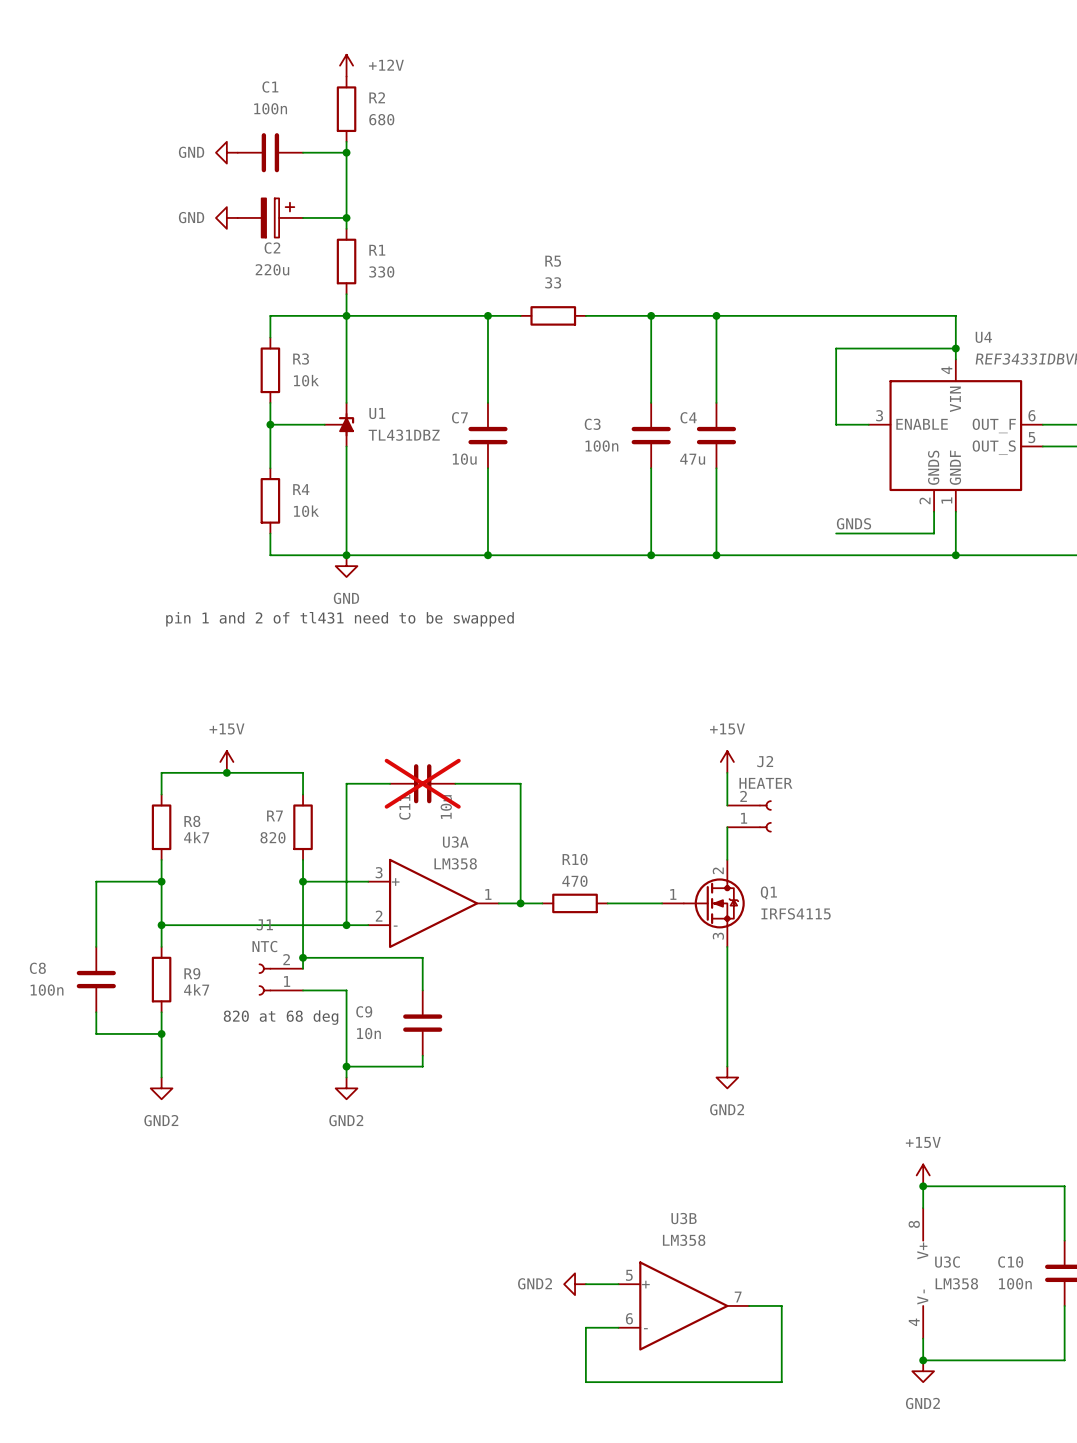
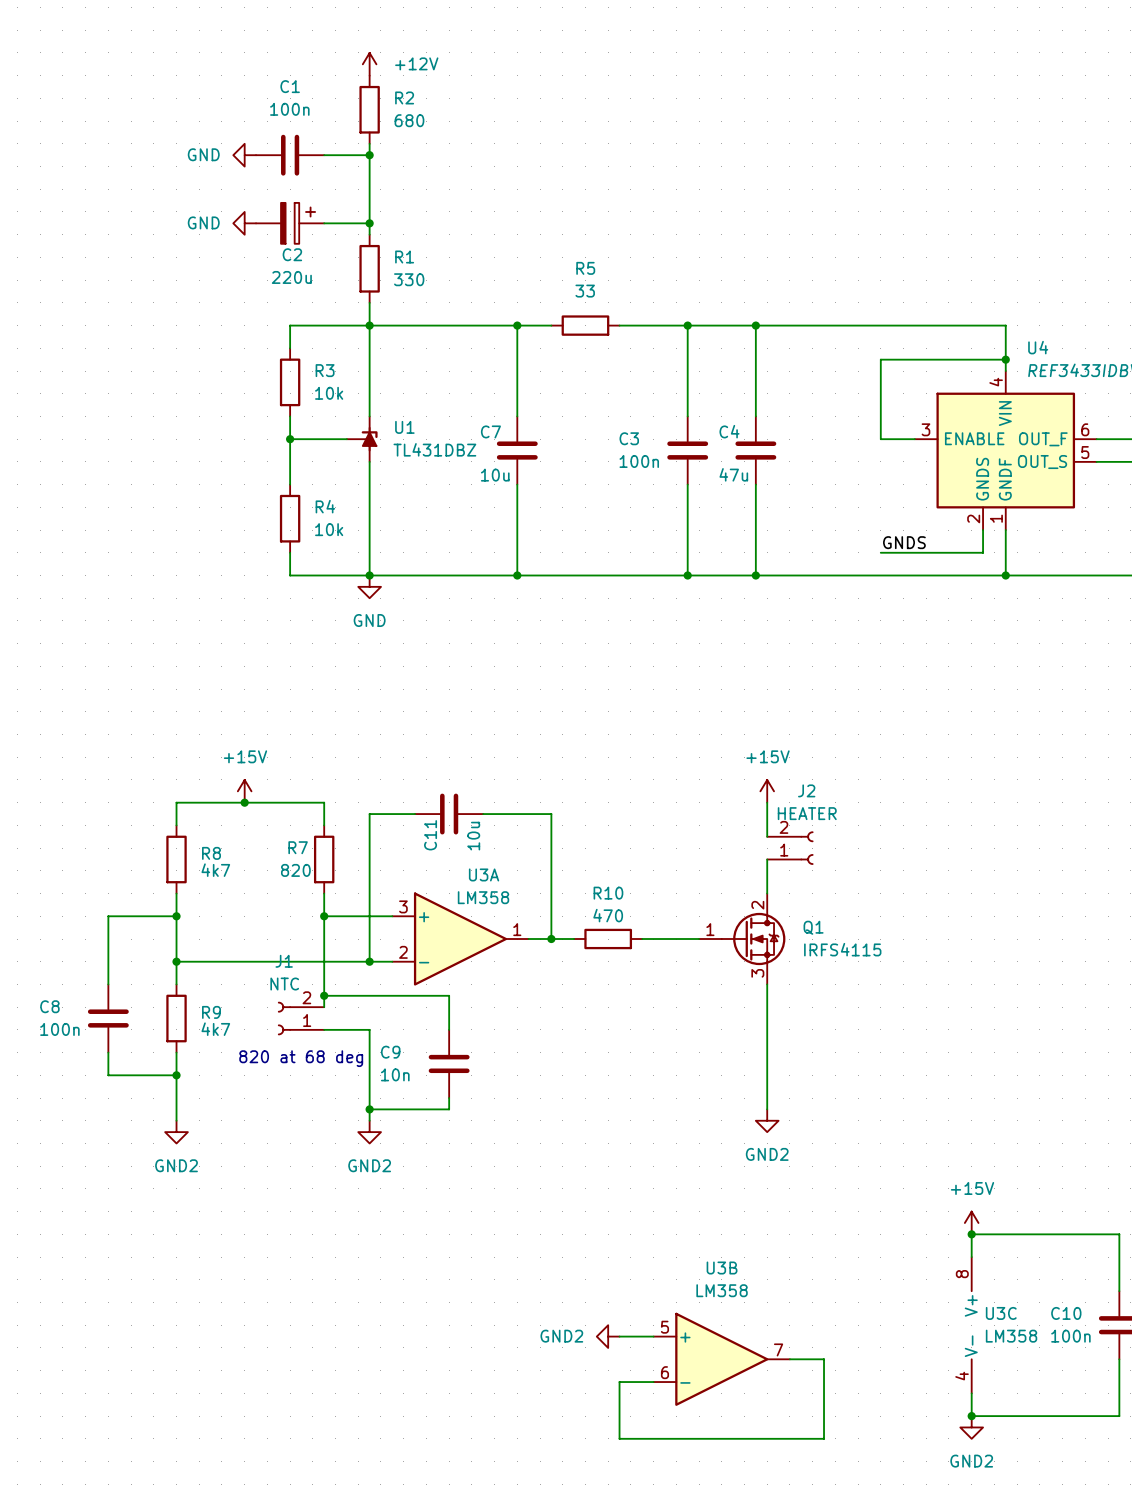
text: pin 1 and 2 of tl431 need to be swapped (340, 619) -> none
C11 do-not-place cross: (422, 783) -> none

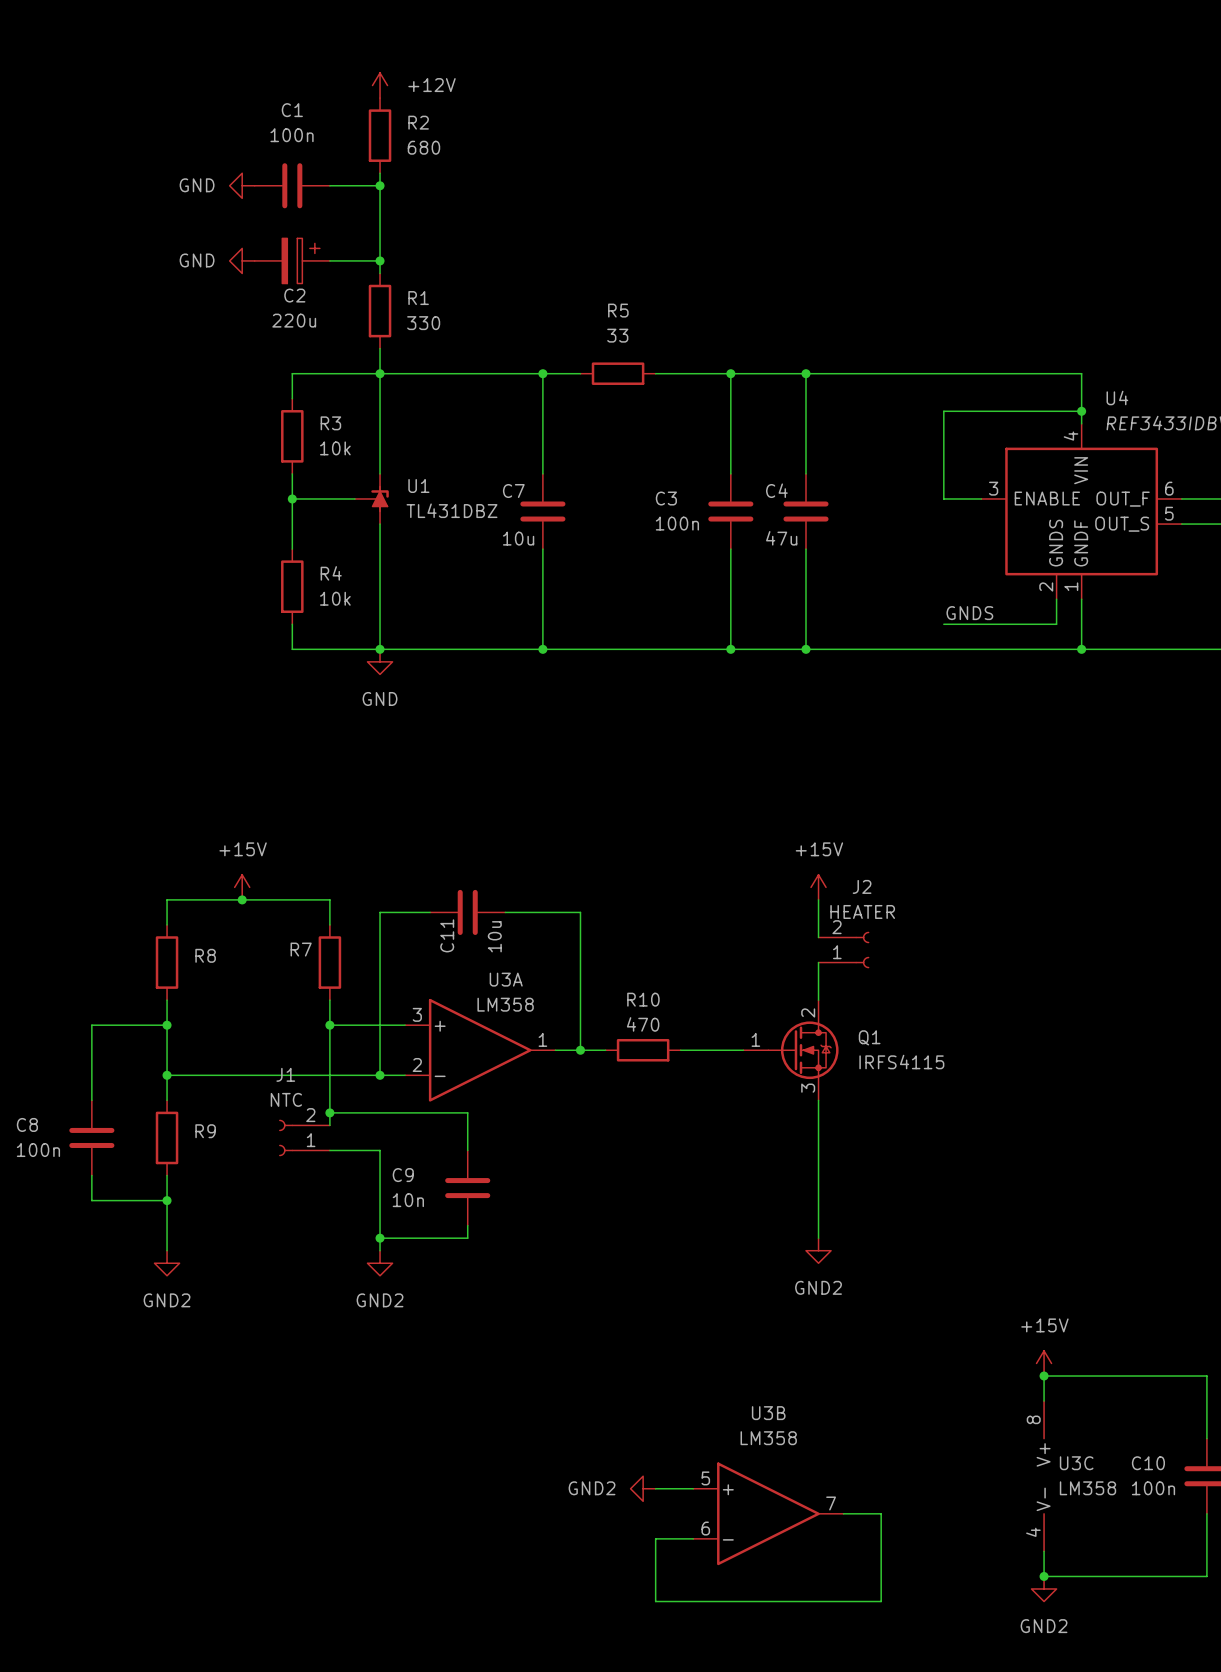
R8 value: 4k7 (215, 870) -> none
R7 value: 820 (295, 870) -> none
R9 value: 4k7 (215, 1029) -> none
text: 820 at 68 deg (301, 1058) -> none

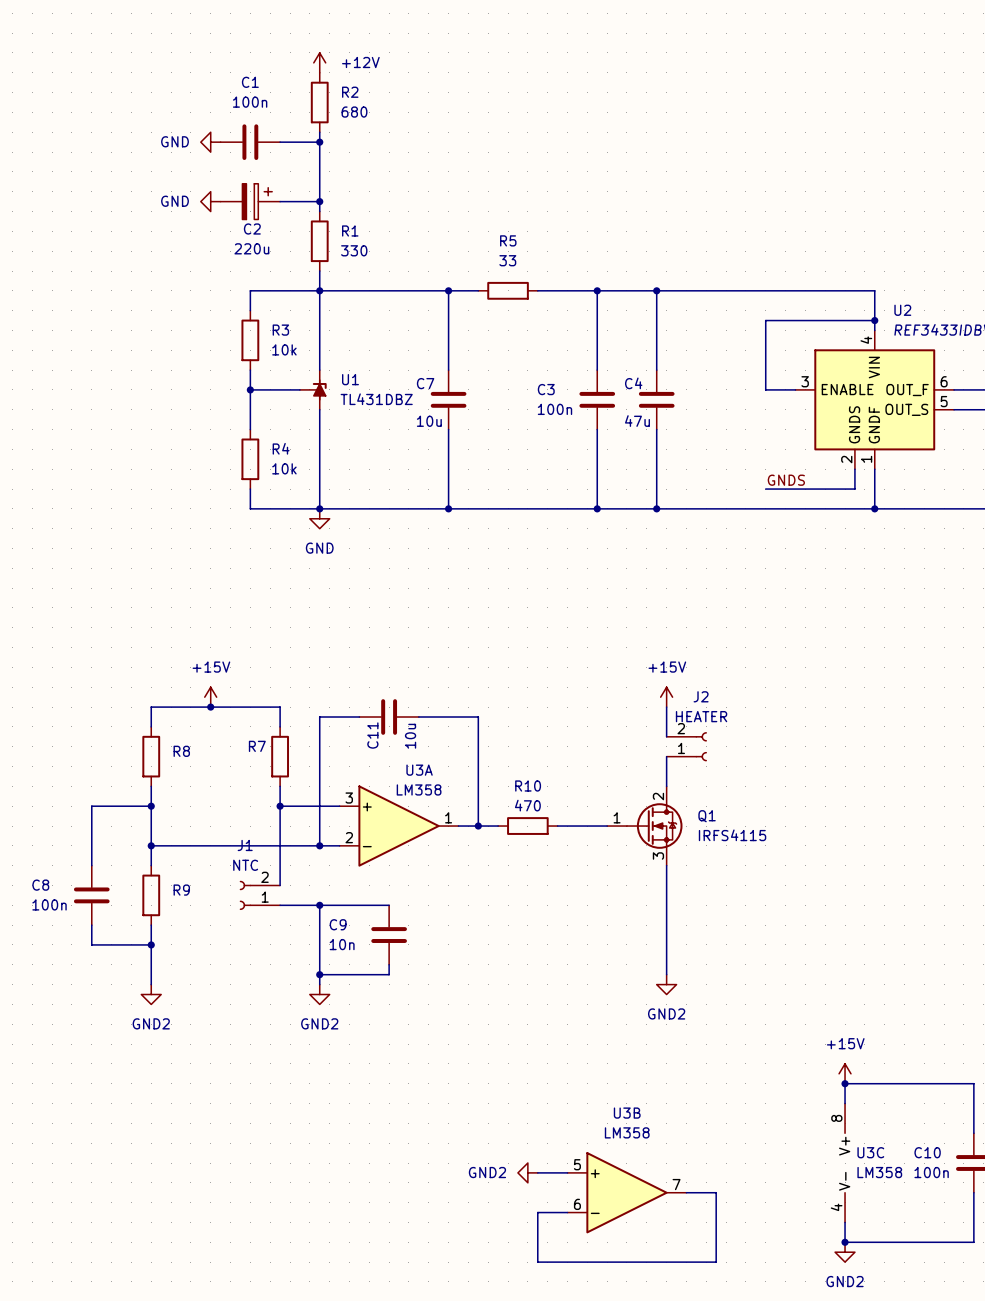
U4 name: U4 (1117, 397) -> U2 (902, 310)
wire: (329, 1112) (467, 1112) (467, 1150) -> (319, 905) (389, 905)
junction: (329, 1112) -> none
junction: none -> (319, 905)

